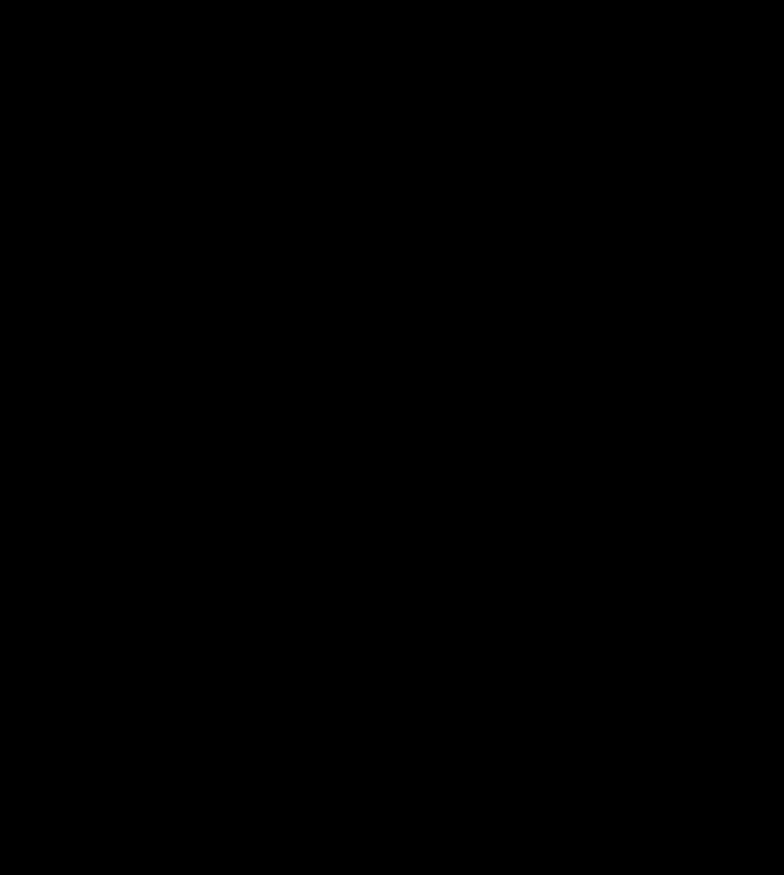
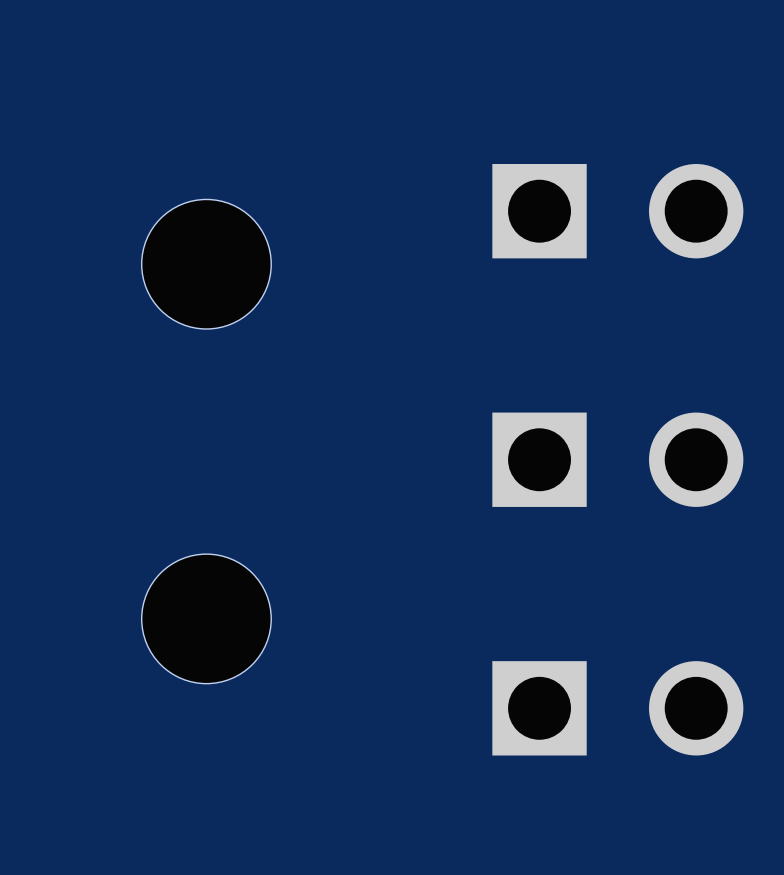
part: none -> (617, 211)
part: none -> (206, 264)
part: none -> (617, 459)
part: none -> (206, 618)
part: none -> (617, 708)

